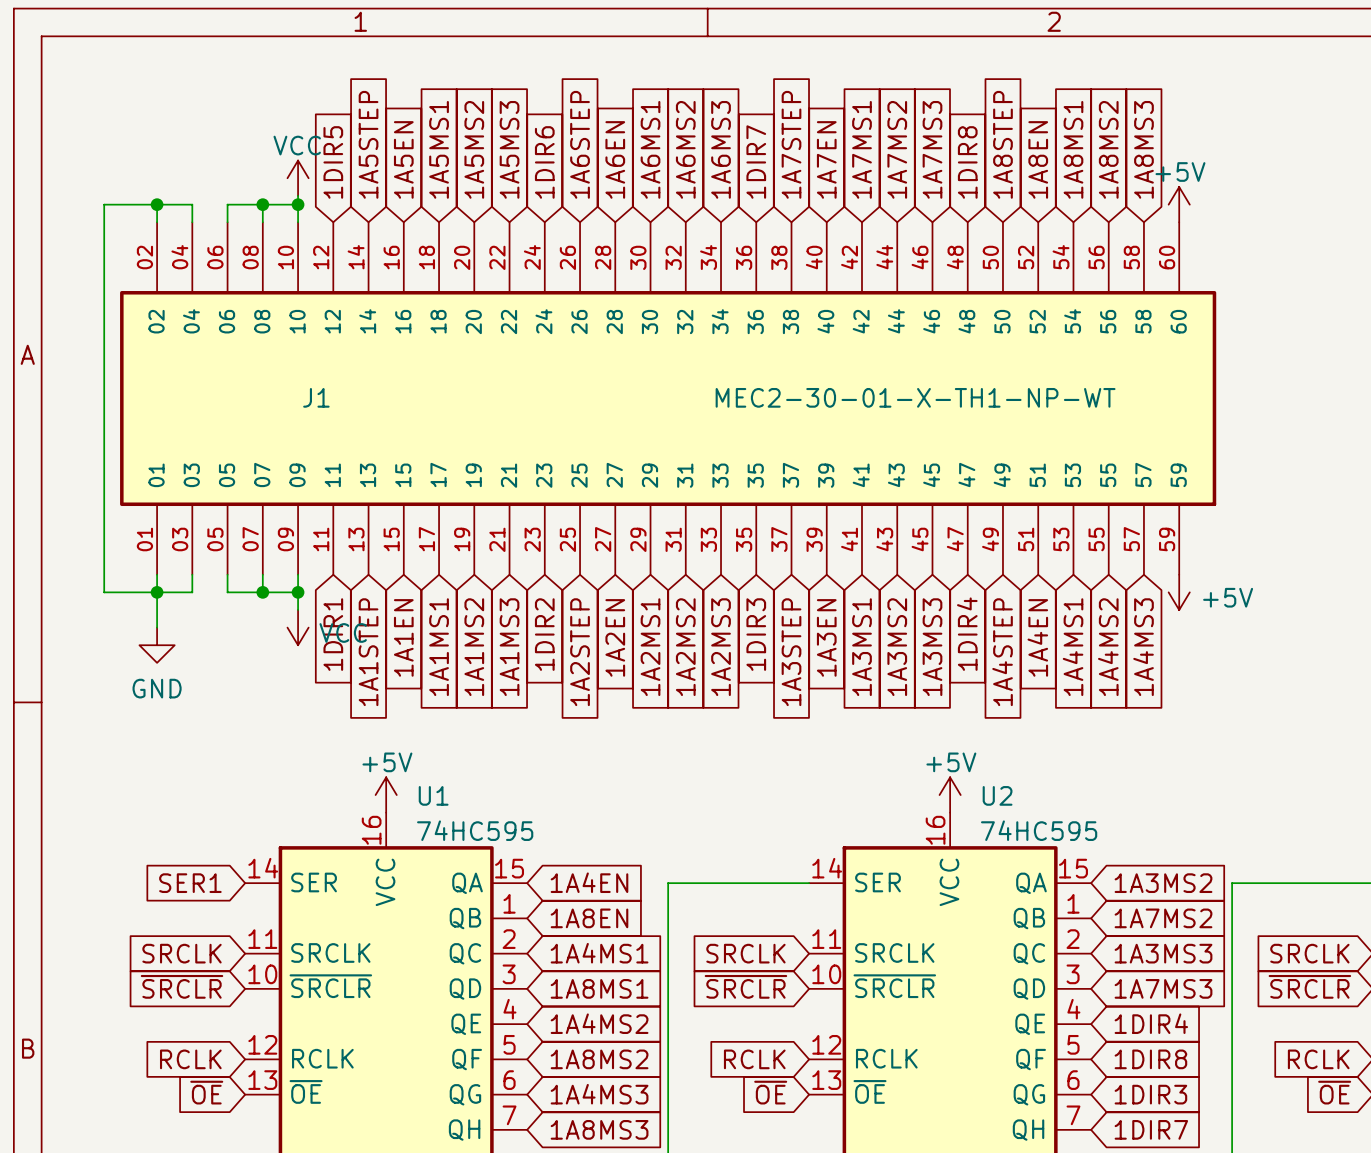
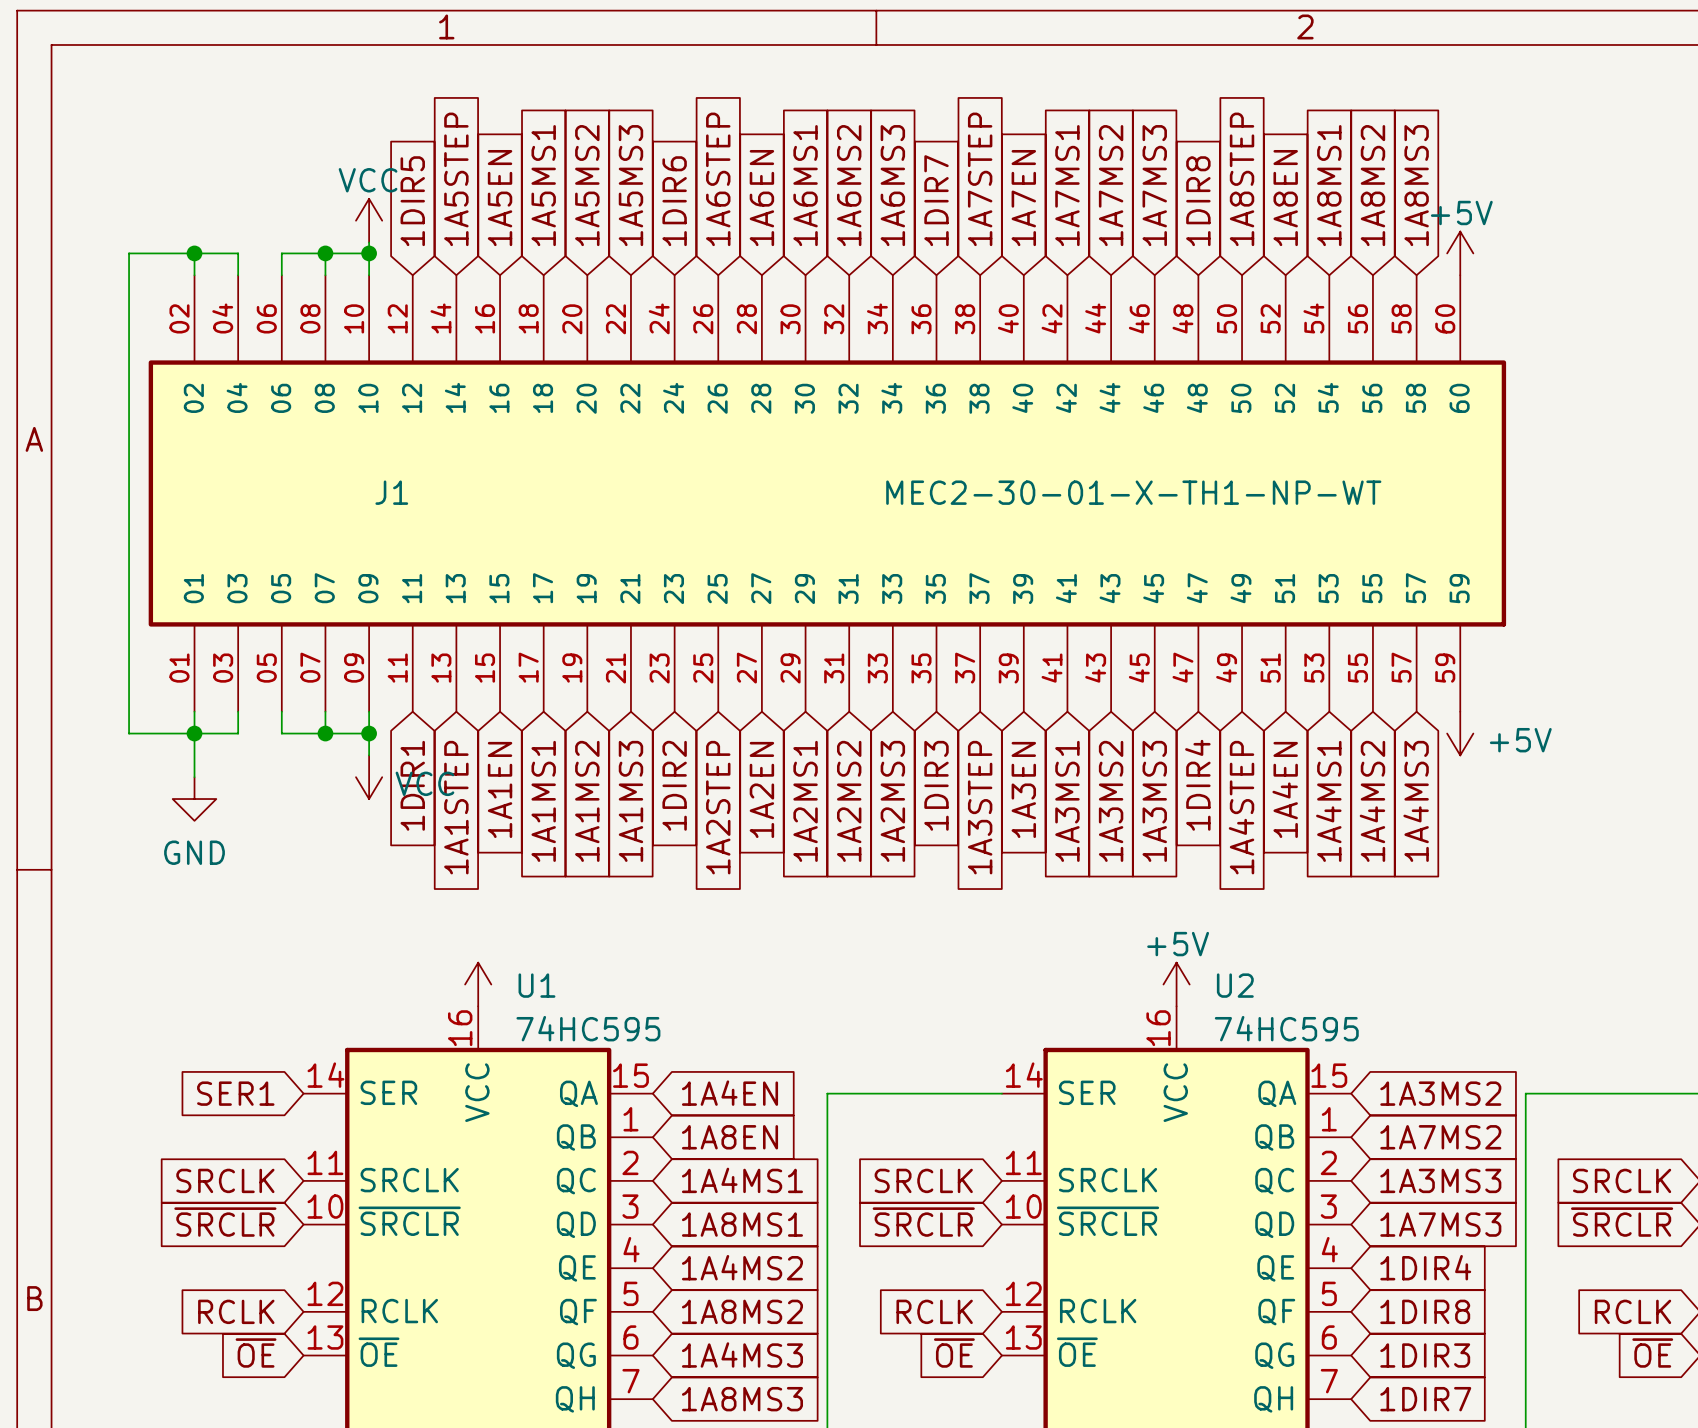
power symbol text: +5V (387, 762) -> none

